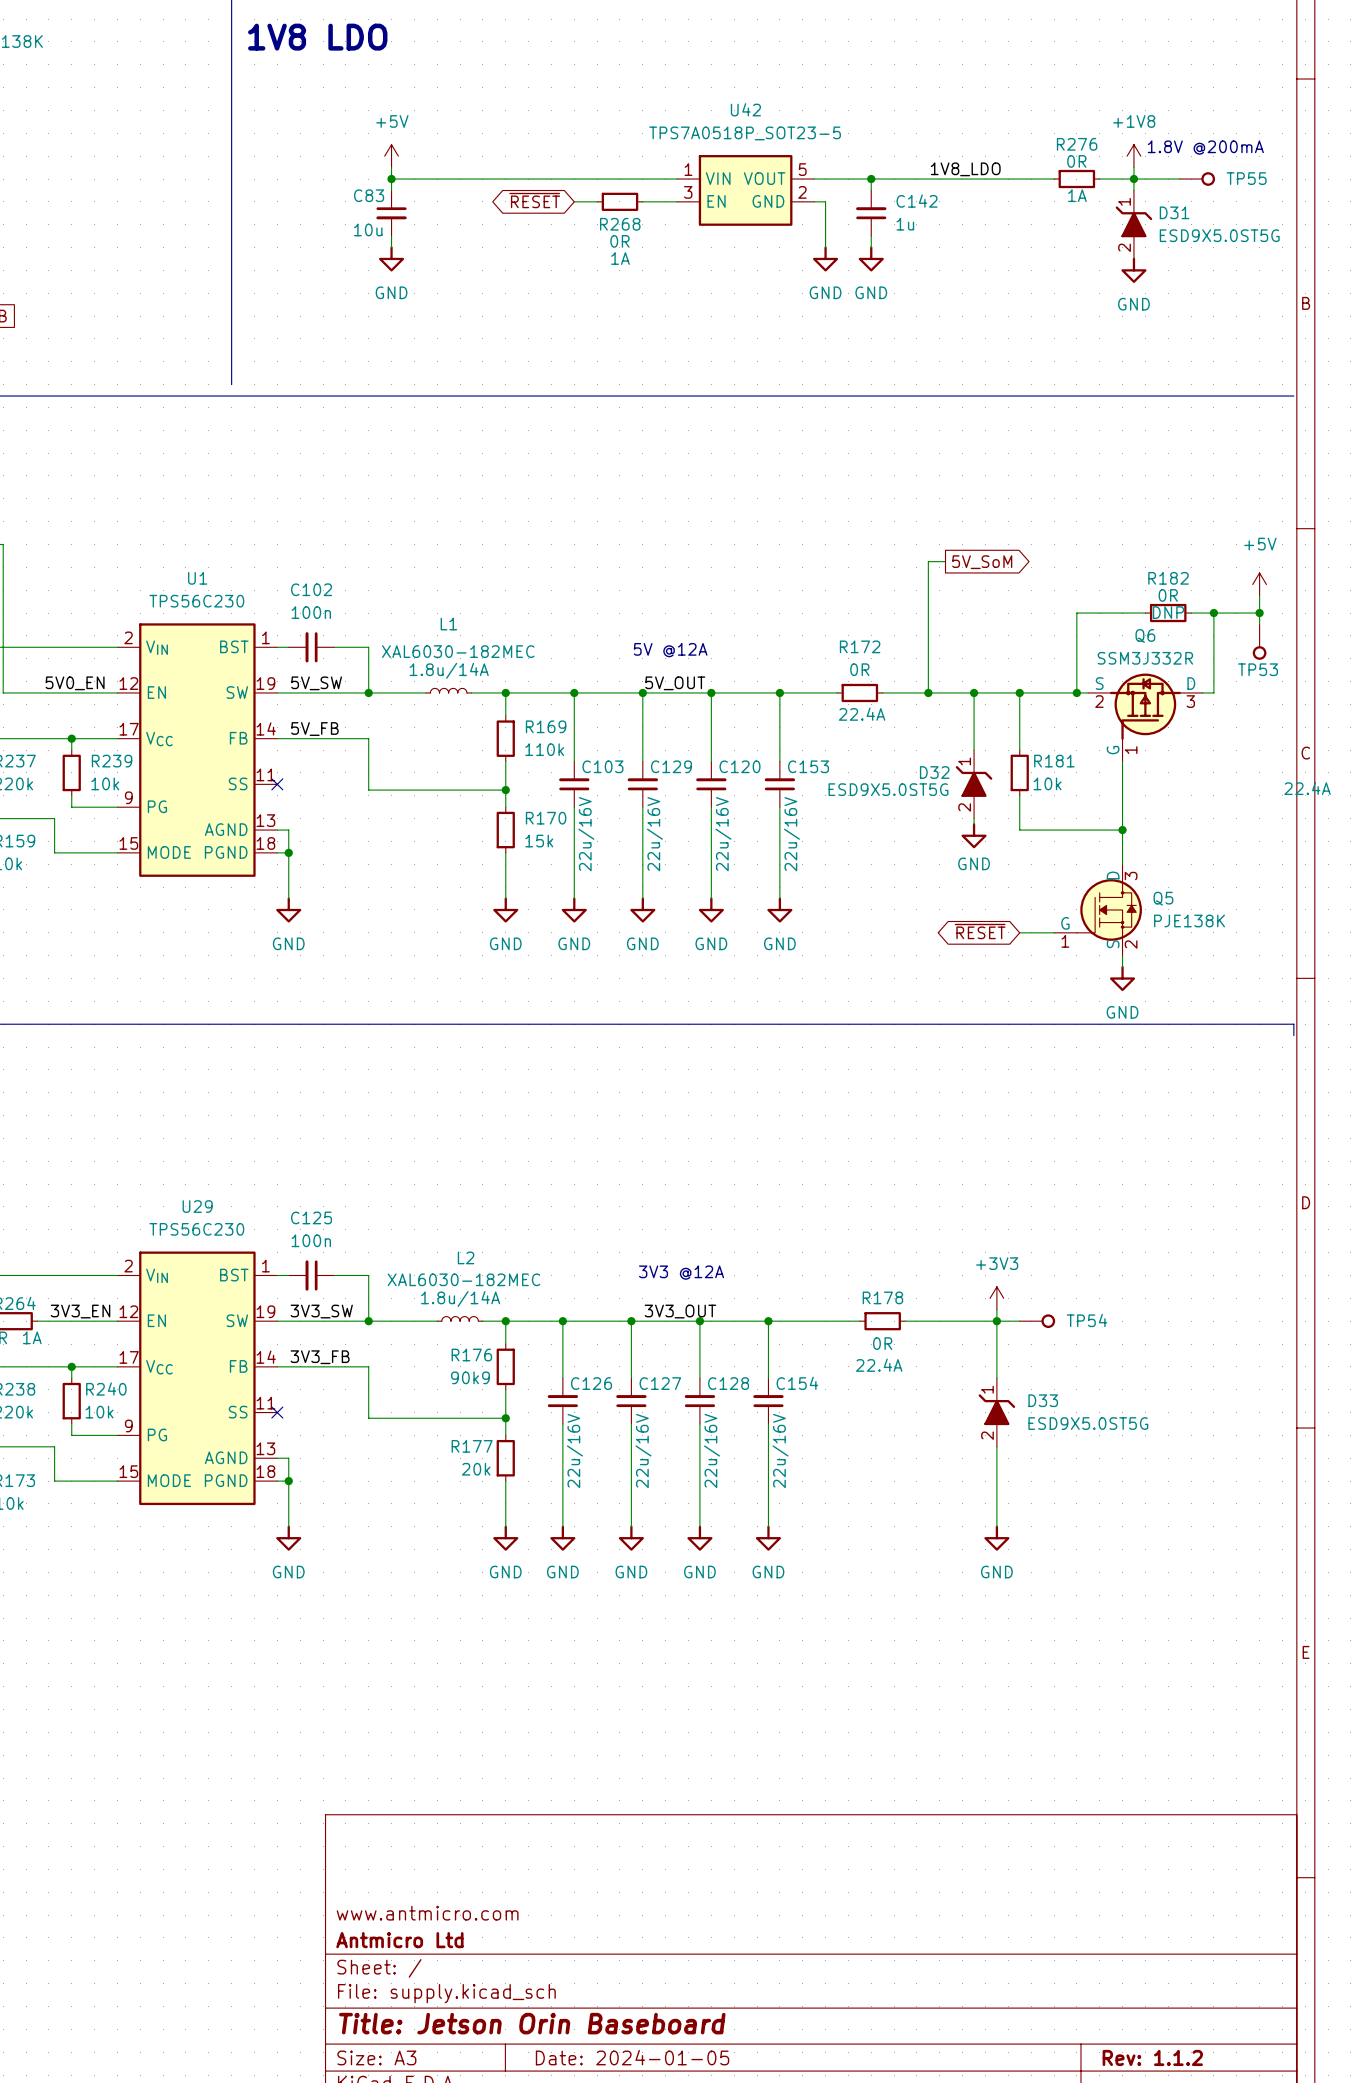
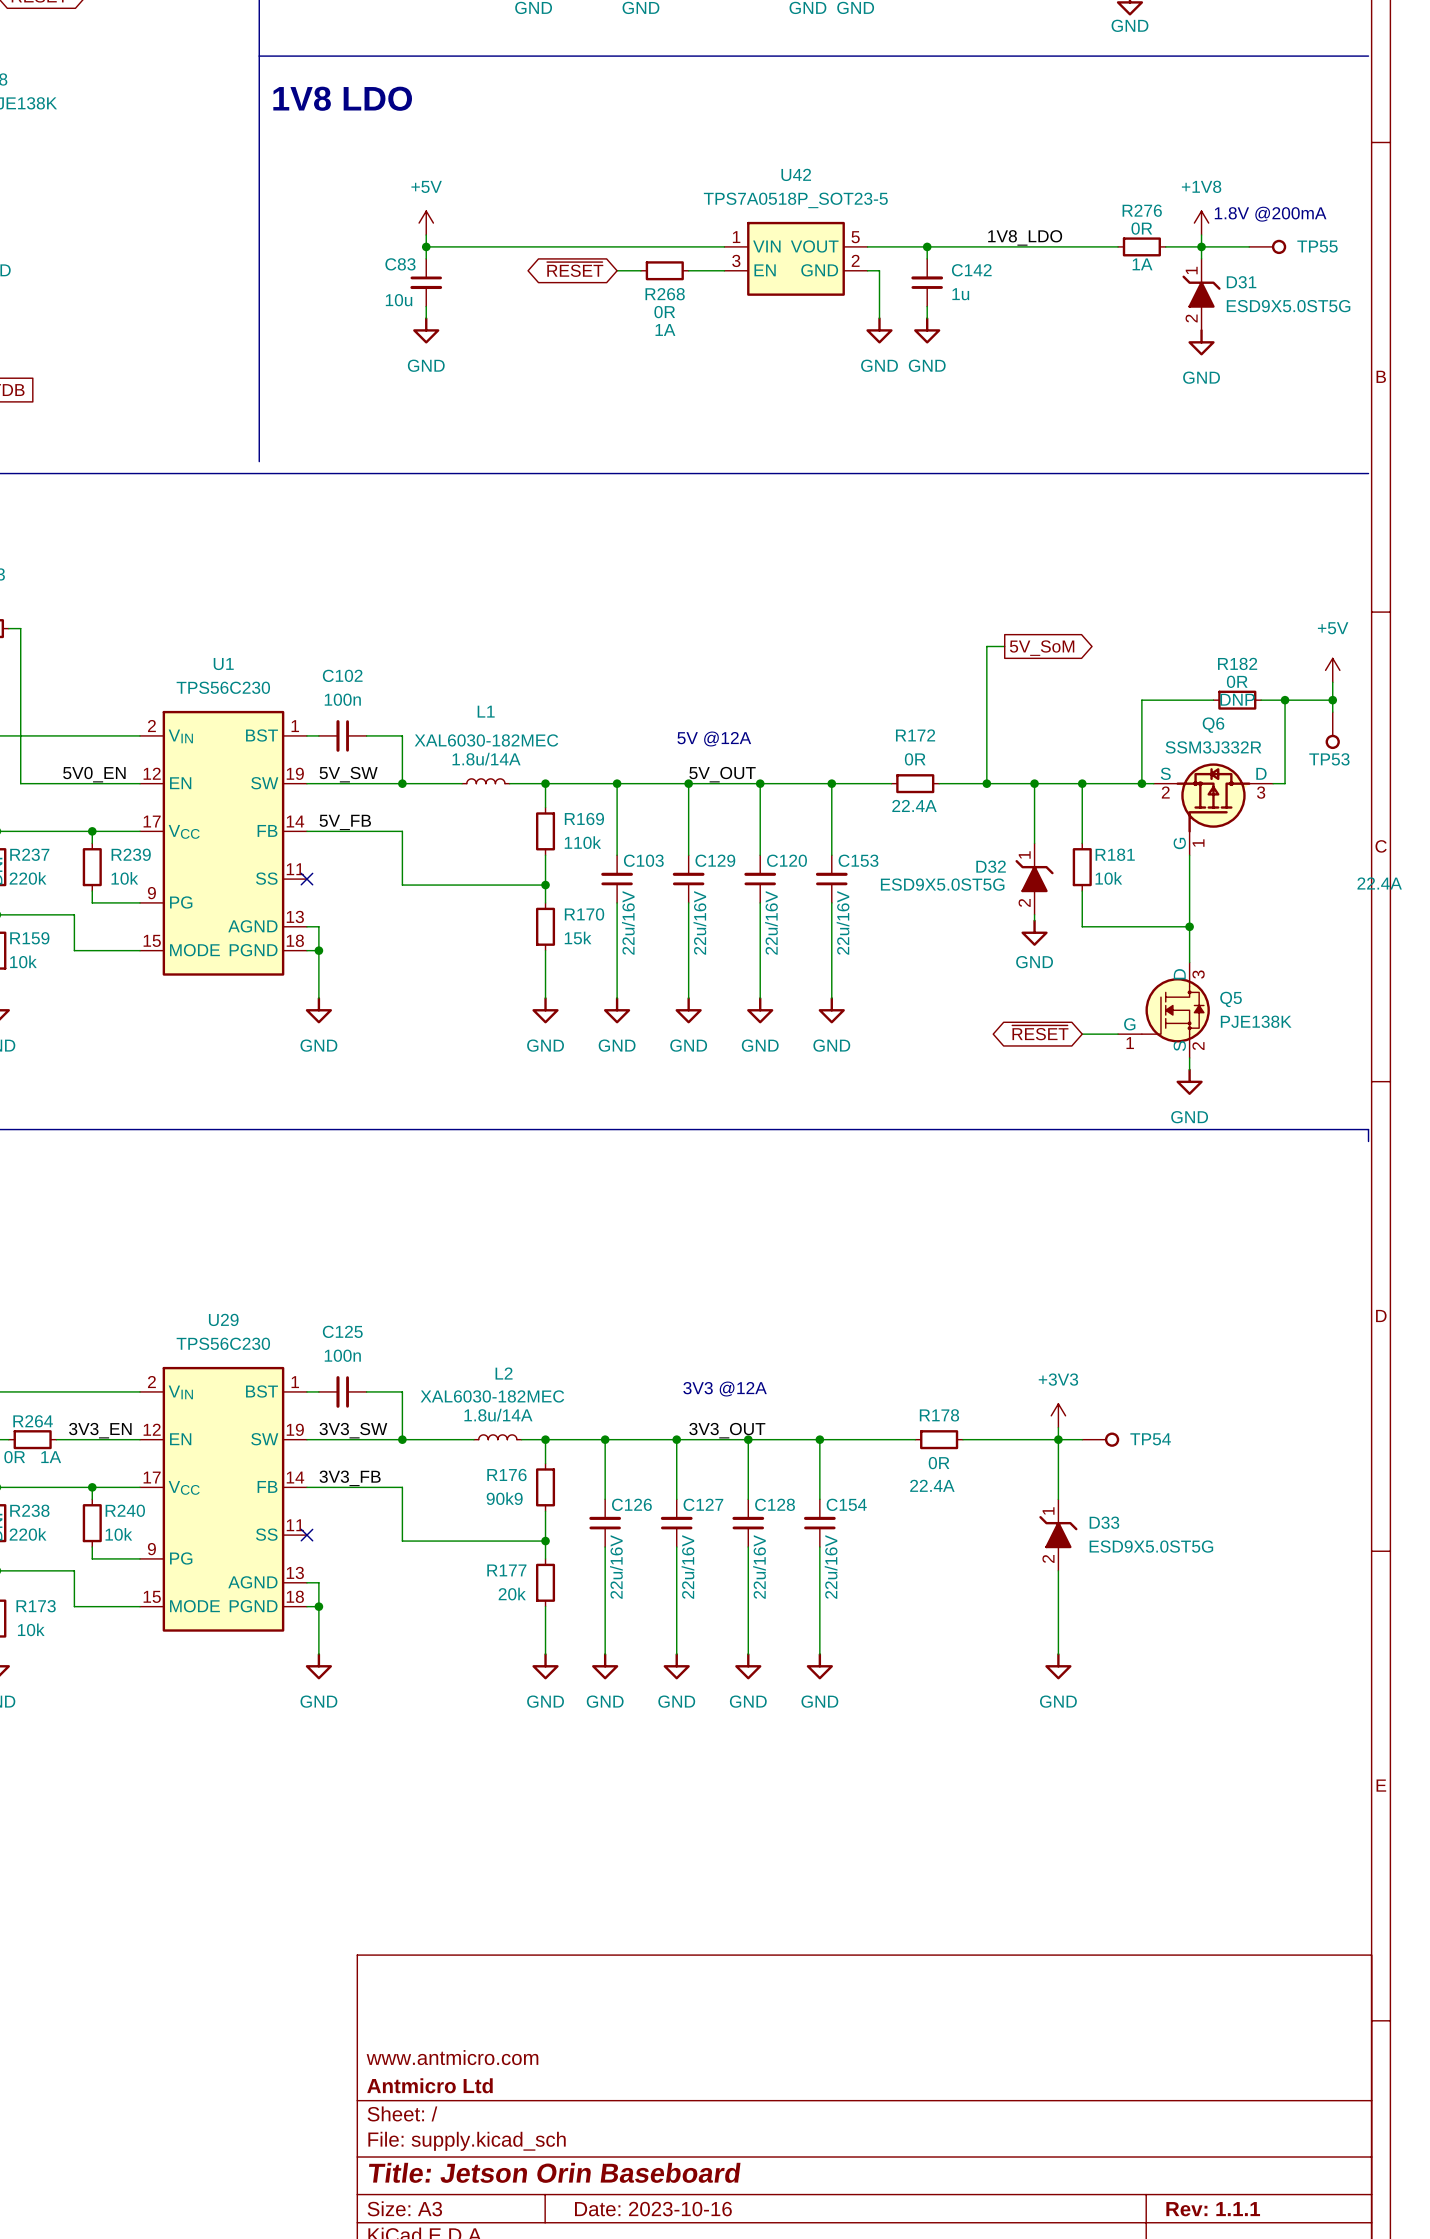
title block: Date: 2024-01-05 (632, 2057) -> Date: 2023-10-16 (653, 2209)
title block: Rev: 1.1.2 (1152, 2057) -> Rev: 1.1.1 (1213, 2209)

